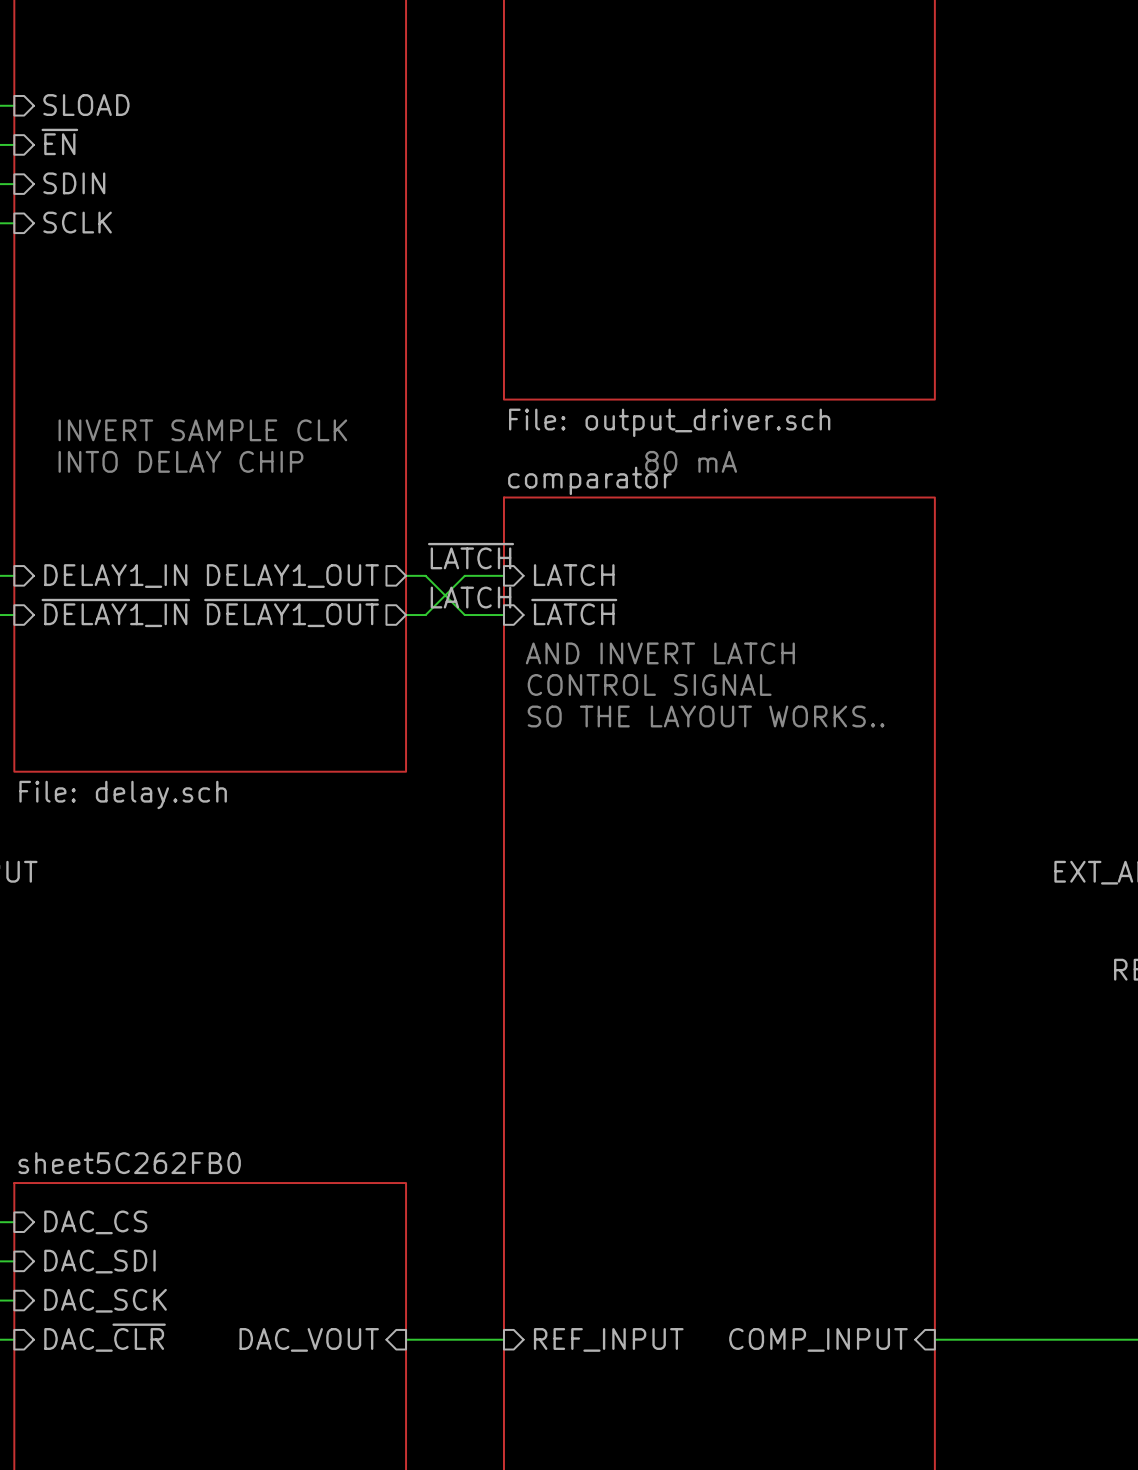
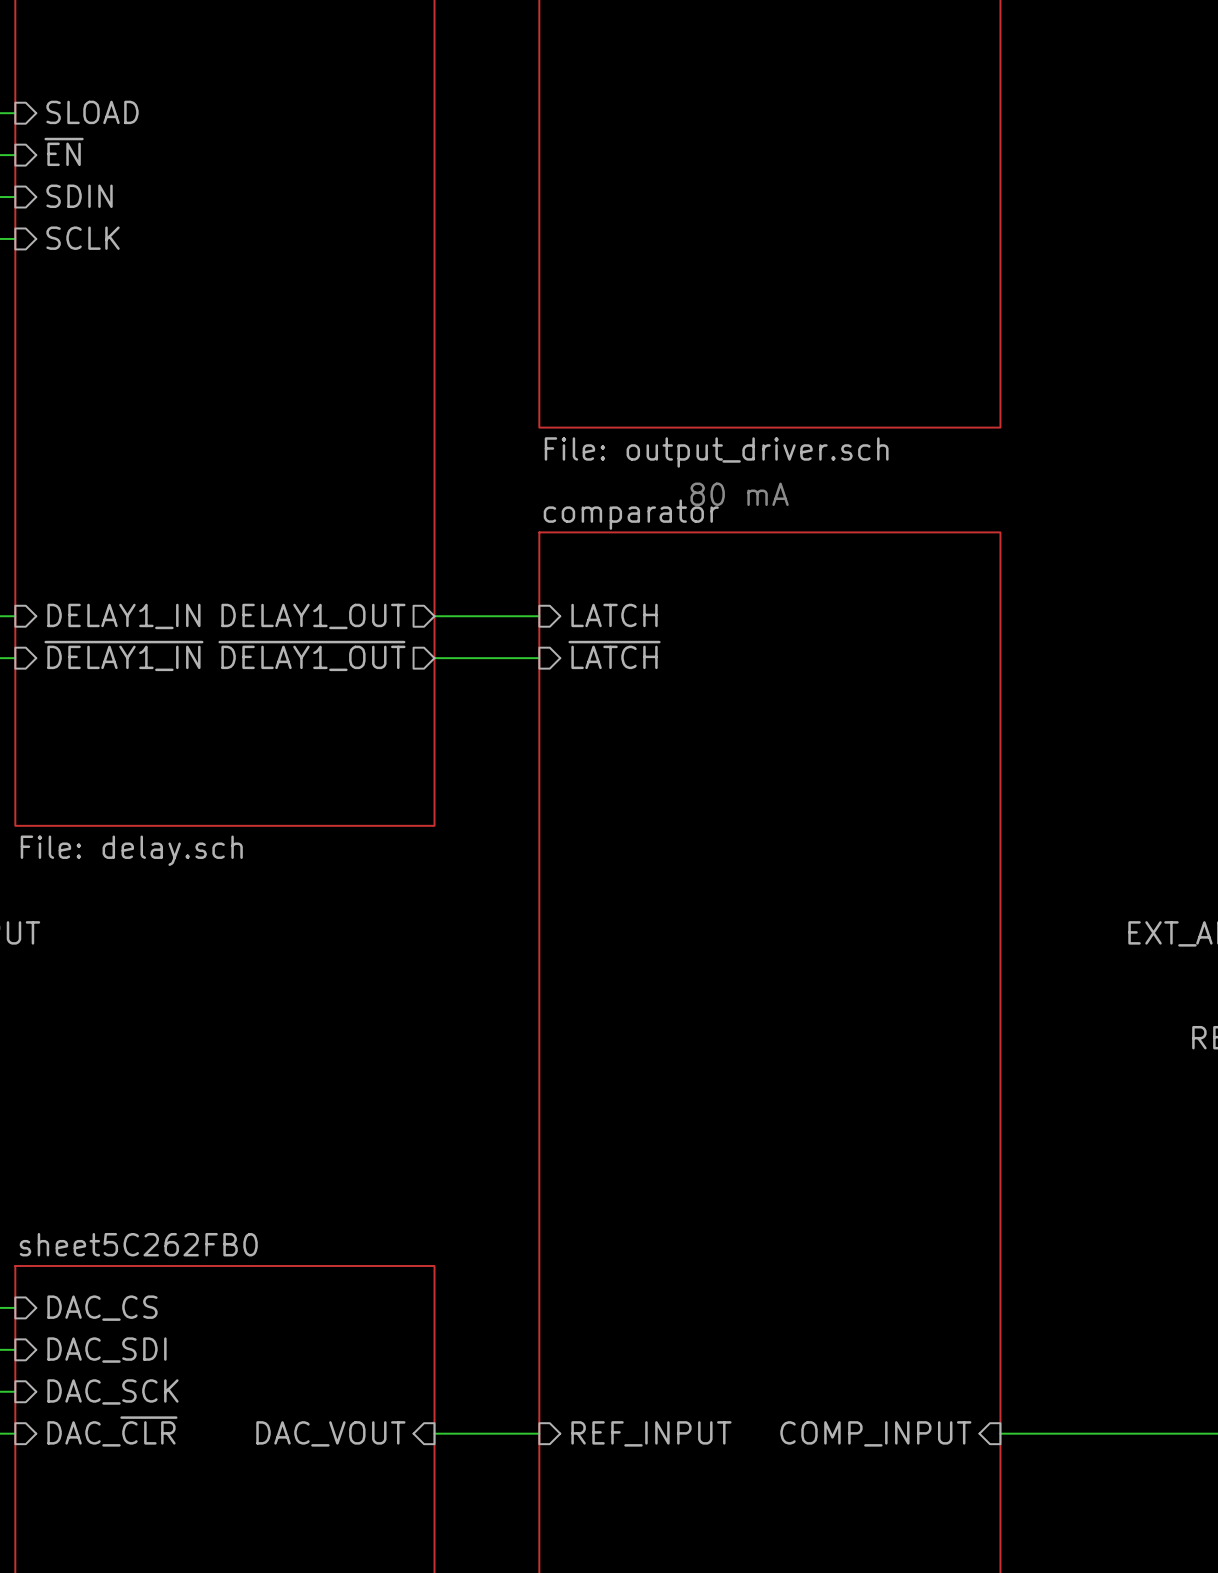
text: INVERT SAMPLE CLK (202, 430) -> none
text: INTO DELAY CHIP (180, 461) -> none
label: ~{LATCH} (471, 556) -> none
wire: (425, 575) (464, 615) -> (455, 616) (497, 616)
wire: (464, 575) (425, 615) -> (497, 658) (455, 658)
label: LATCH (471, 597) -> none
text: AND INVERT LATCH (660, 653) -> none
text: CONTROL SIGNAL (649, 684) -> none
text: SO THE LAYOUT WORKS.. (706, 716) -> none

